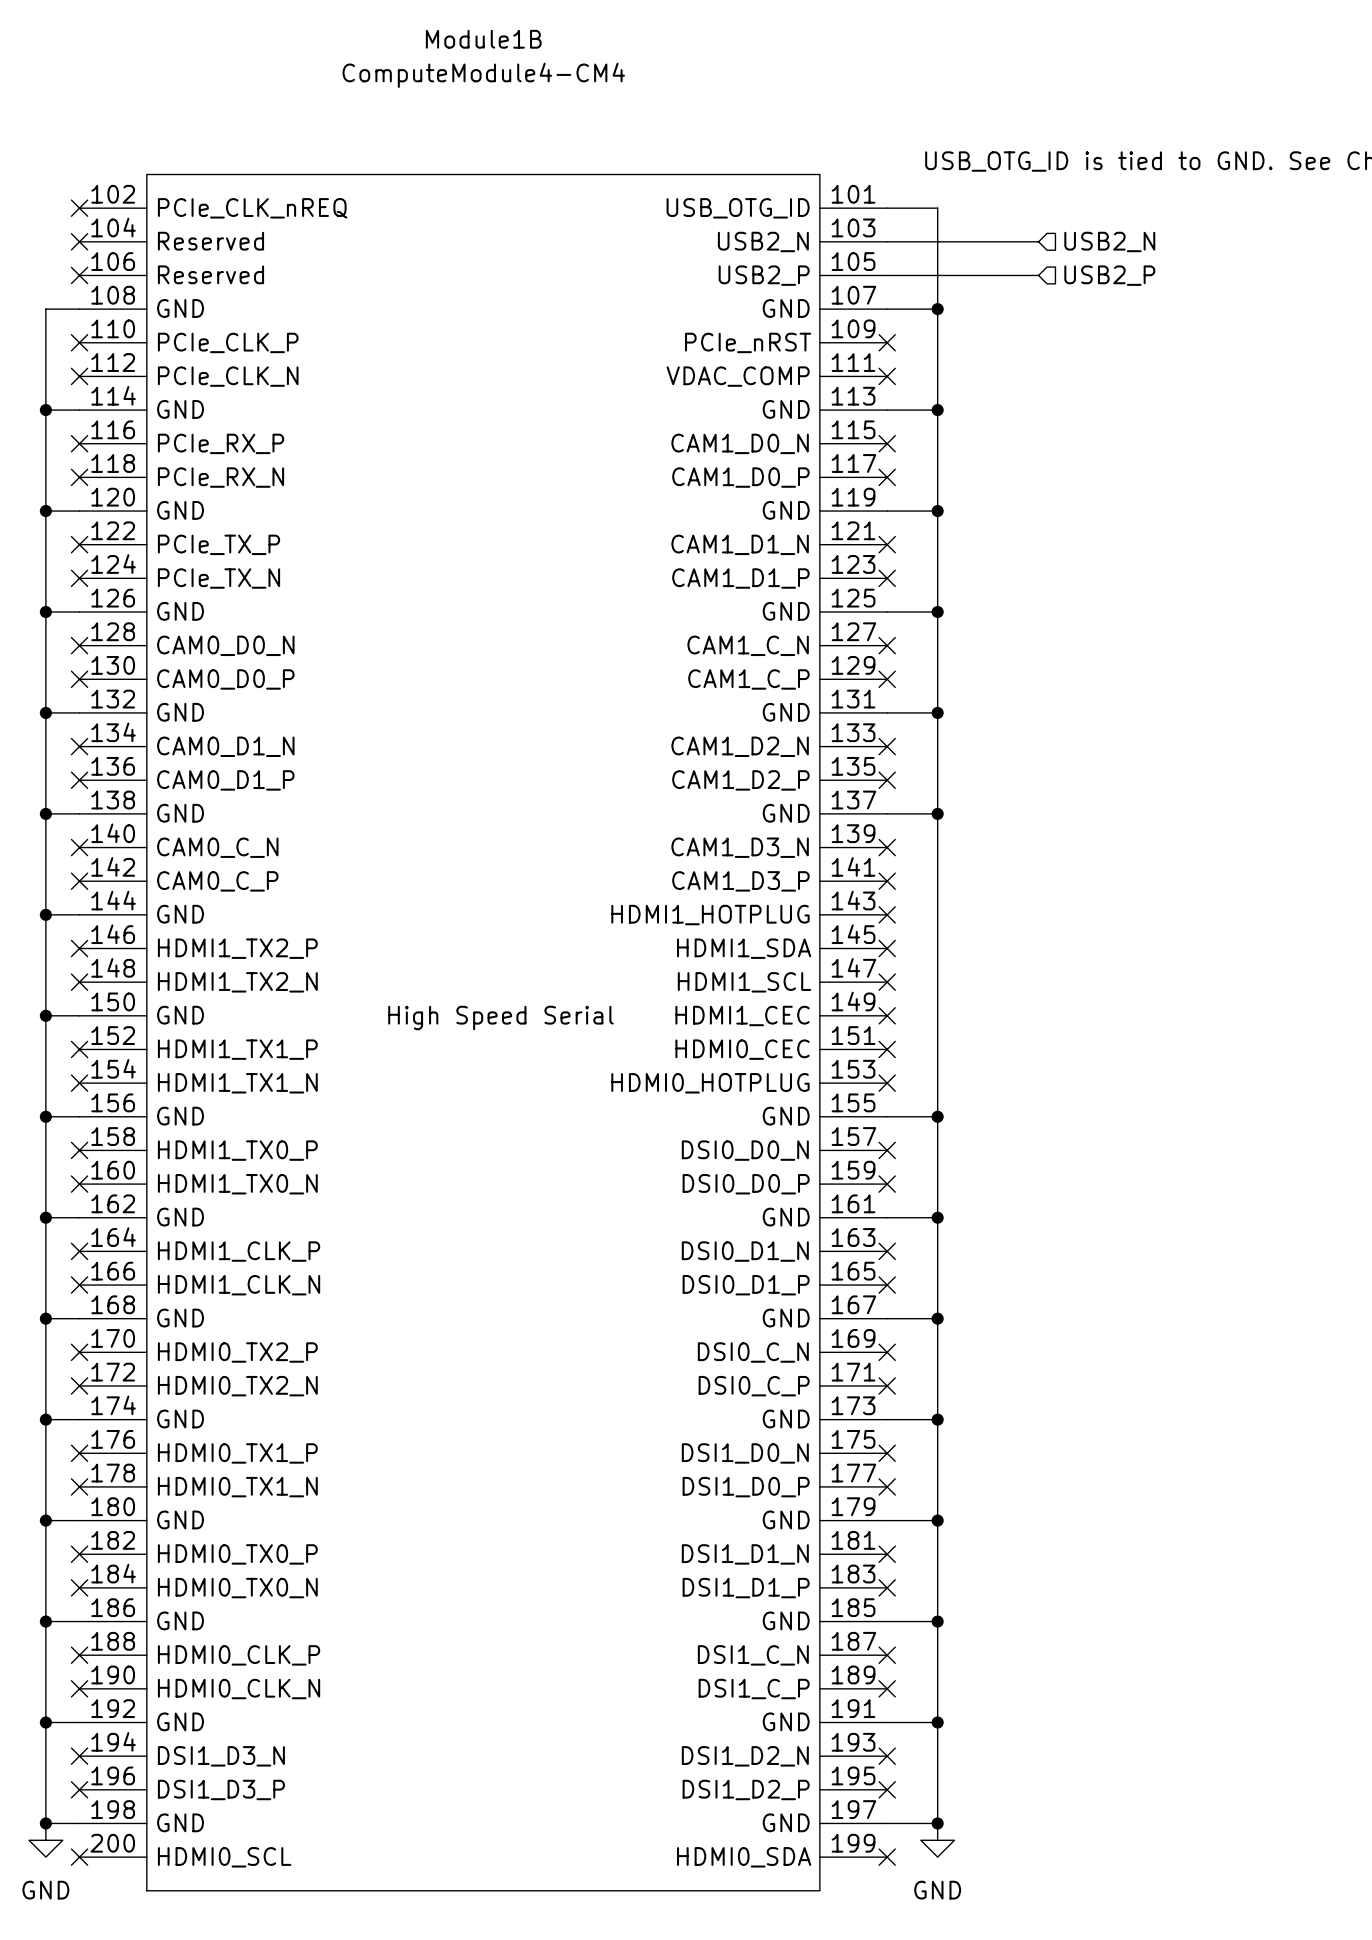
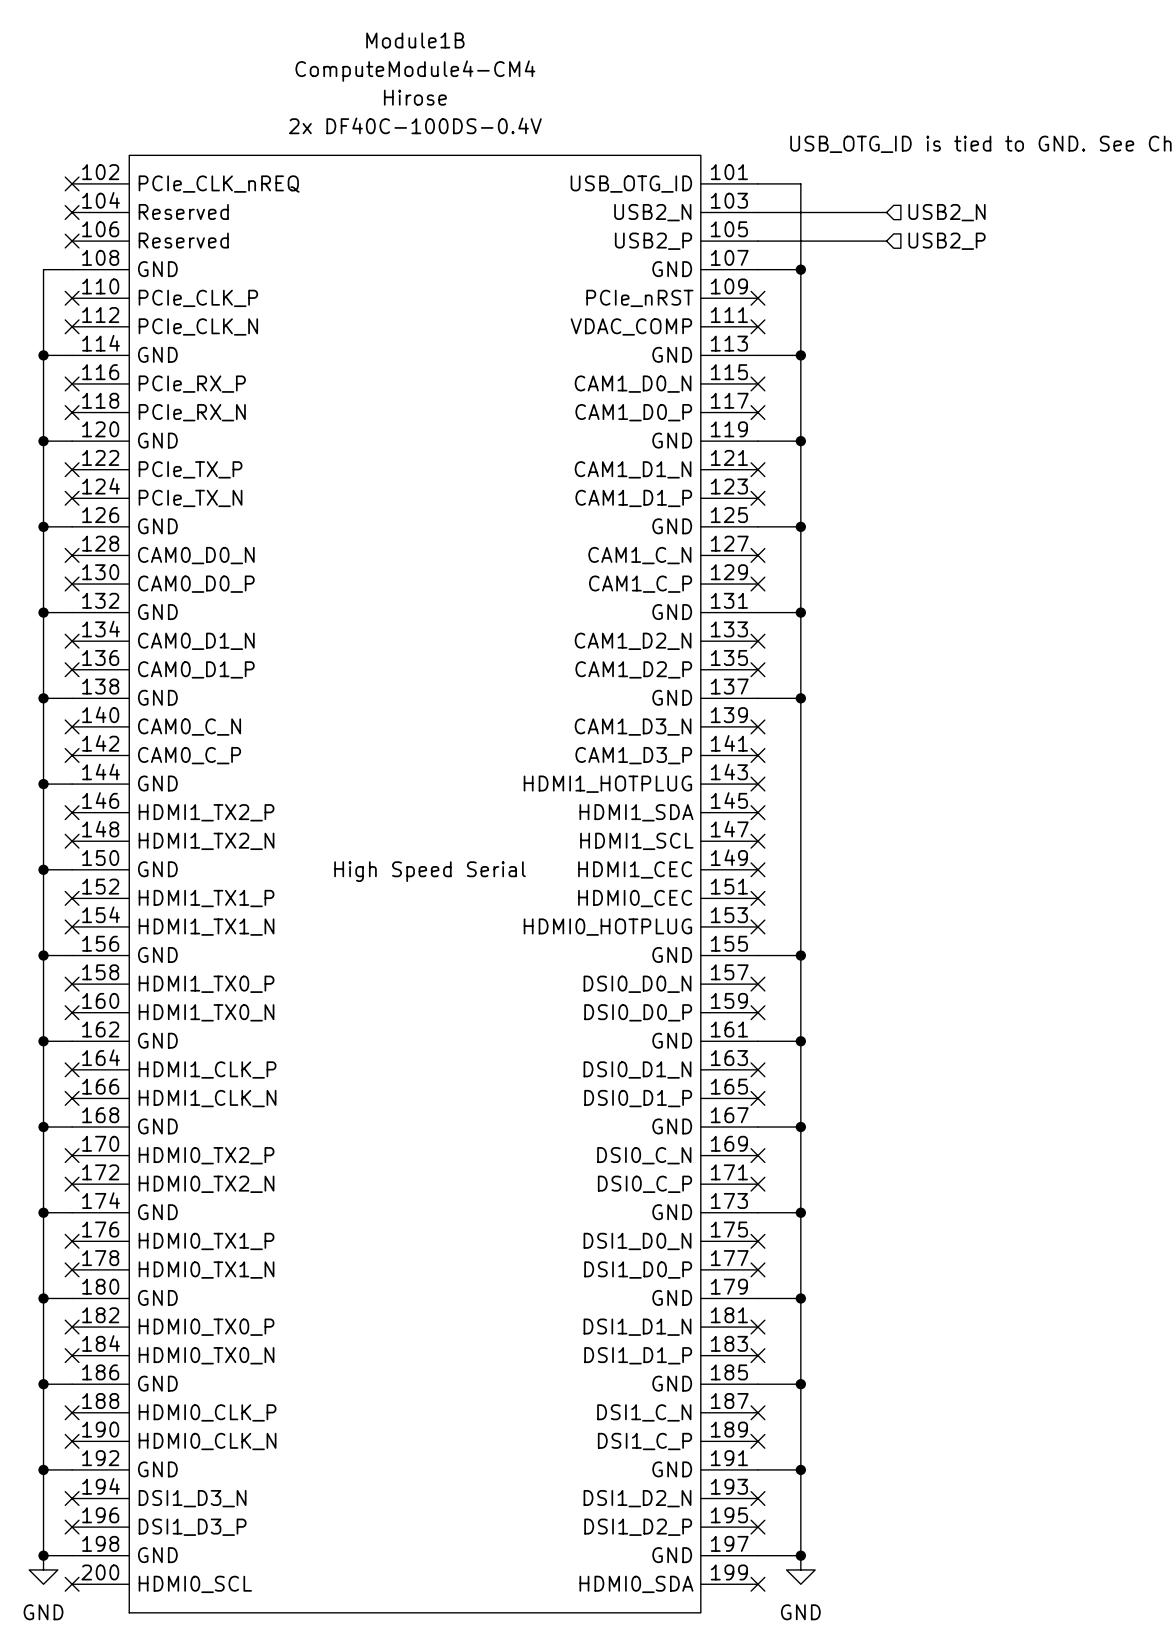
Module1B text: none -> Hirose (415, 97)
Module1B text: none -> 2x DF40C-100DS-0.4V (415, 125)

